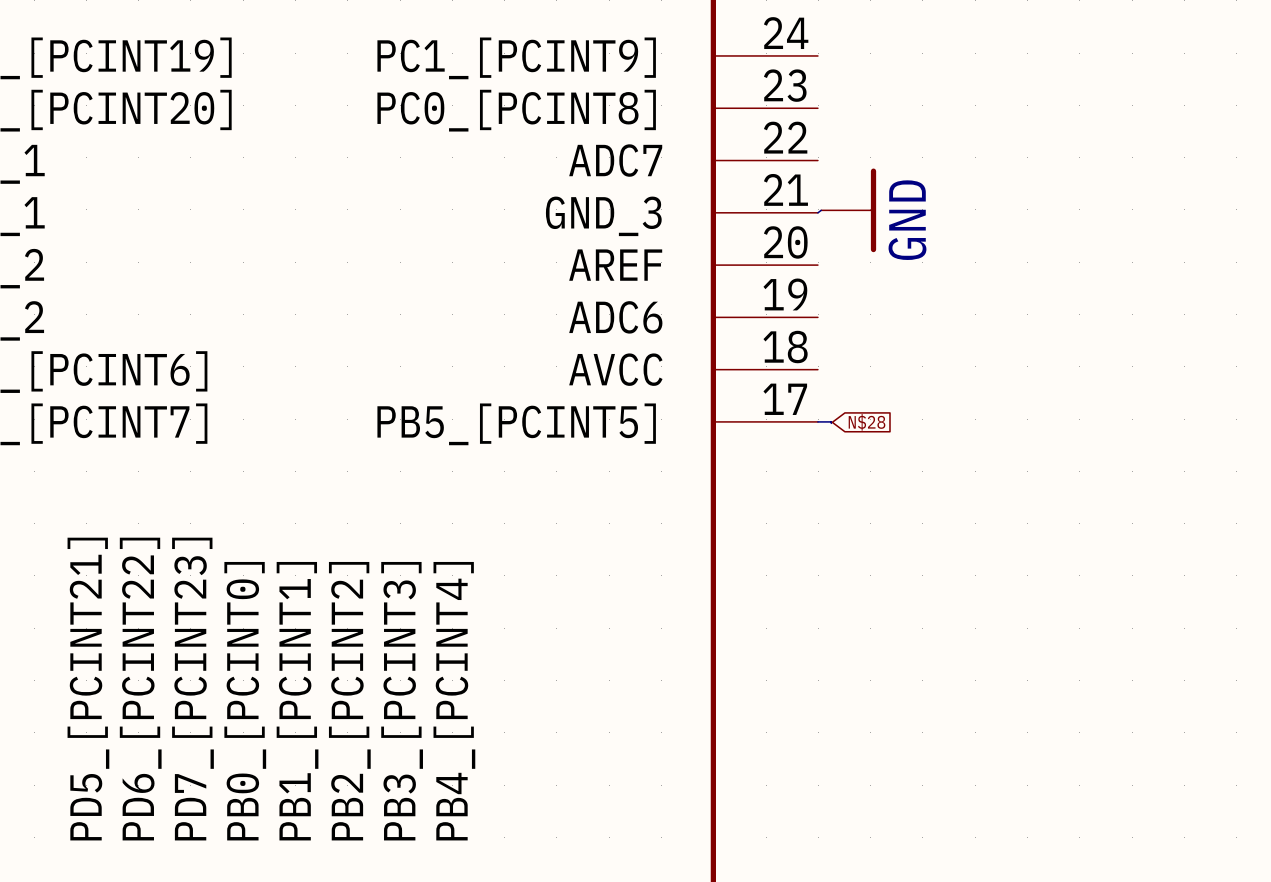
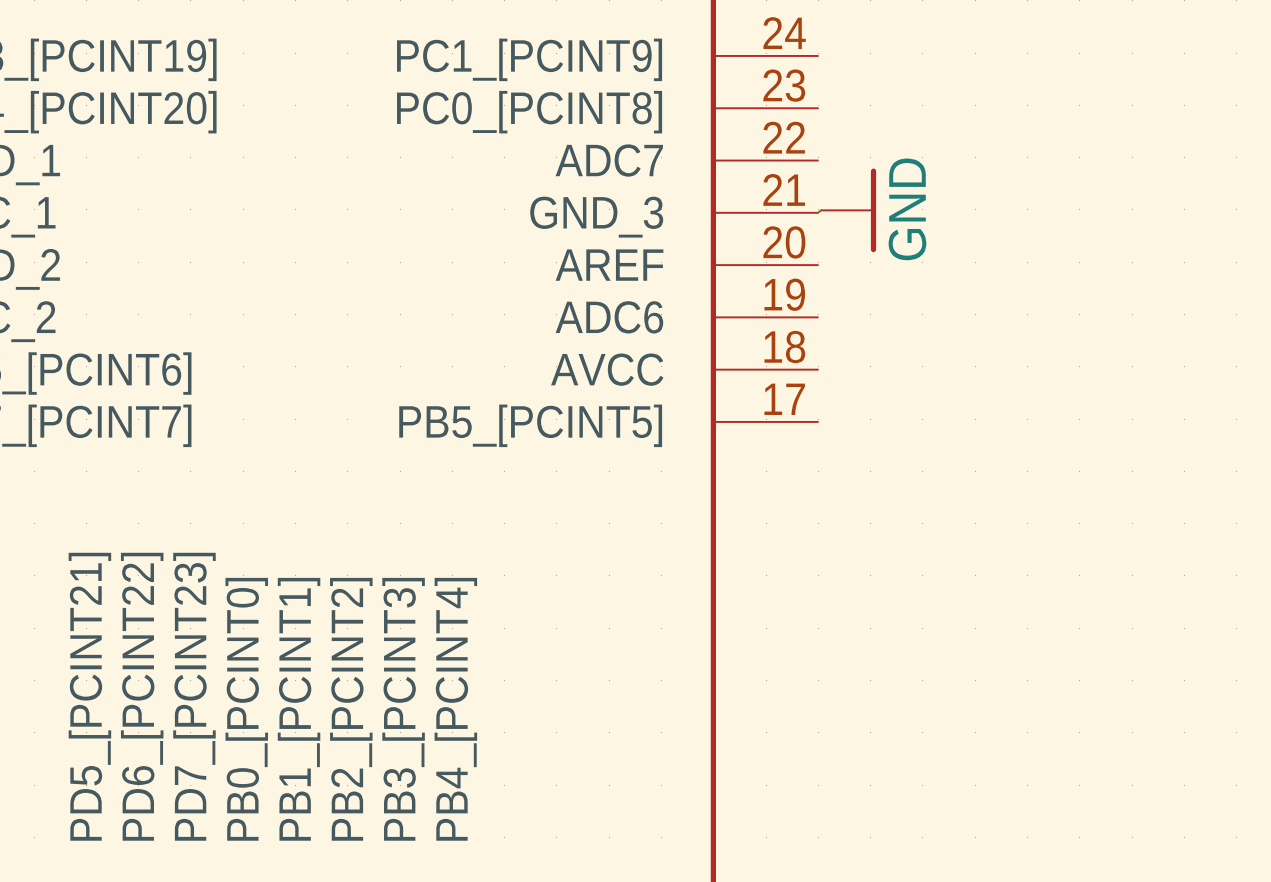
wire: (817, 421) (831, 423) -> none
global label: N$28 (867, 422) -> none

